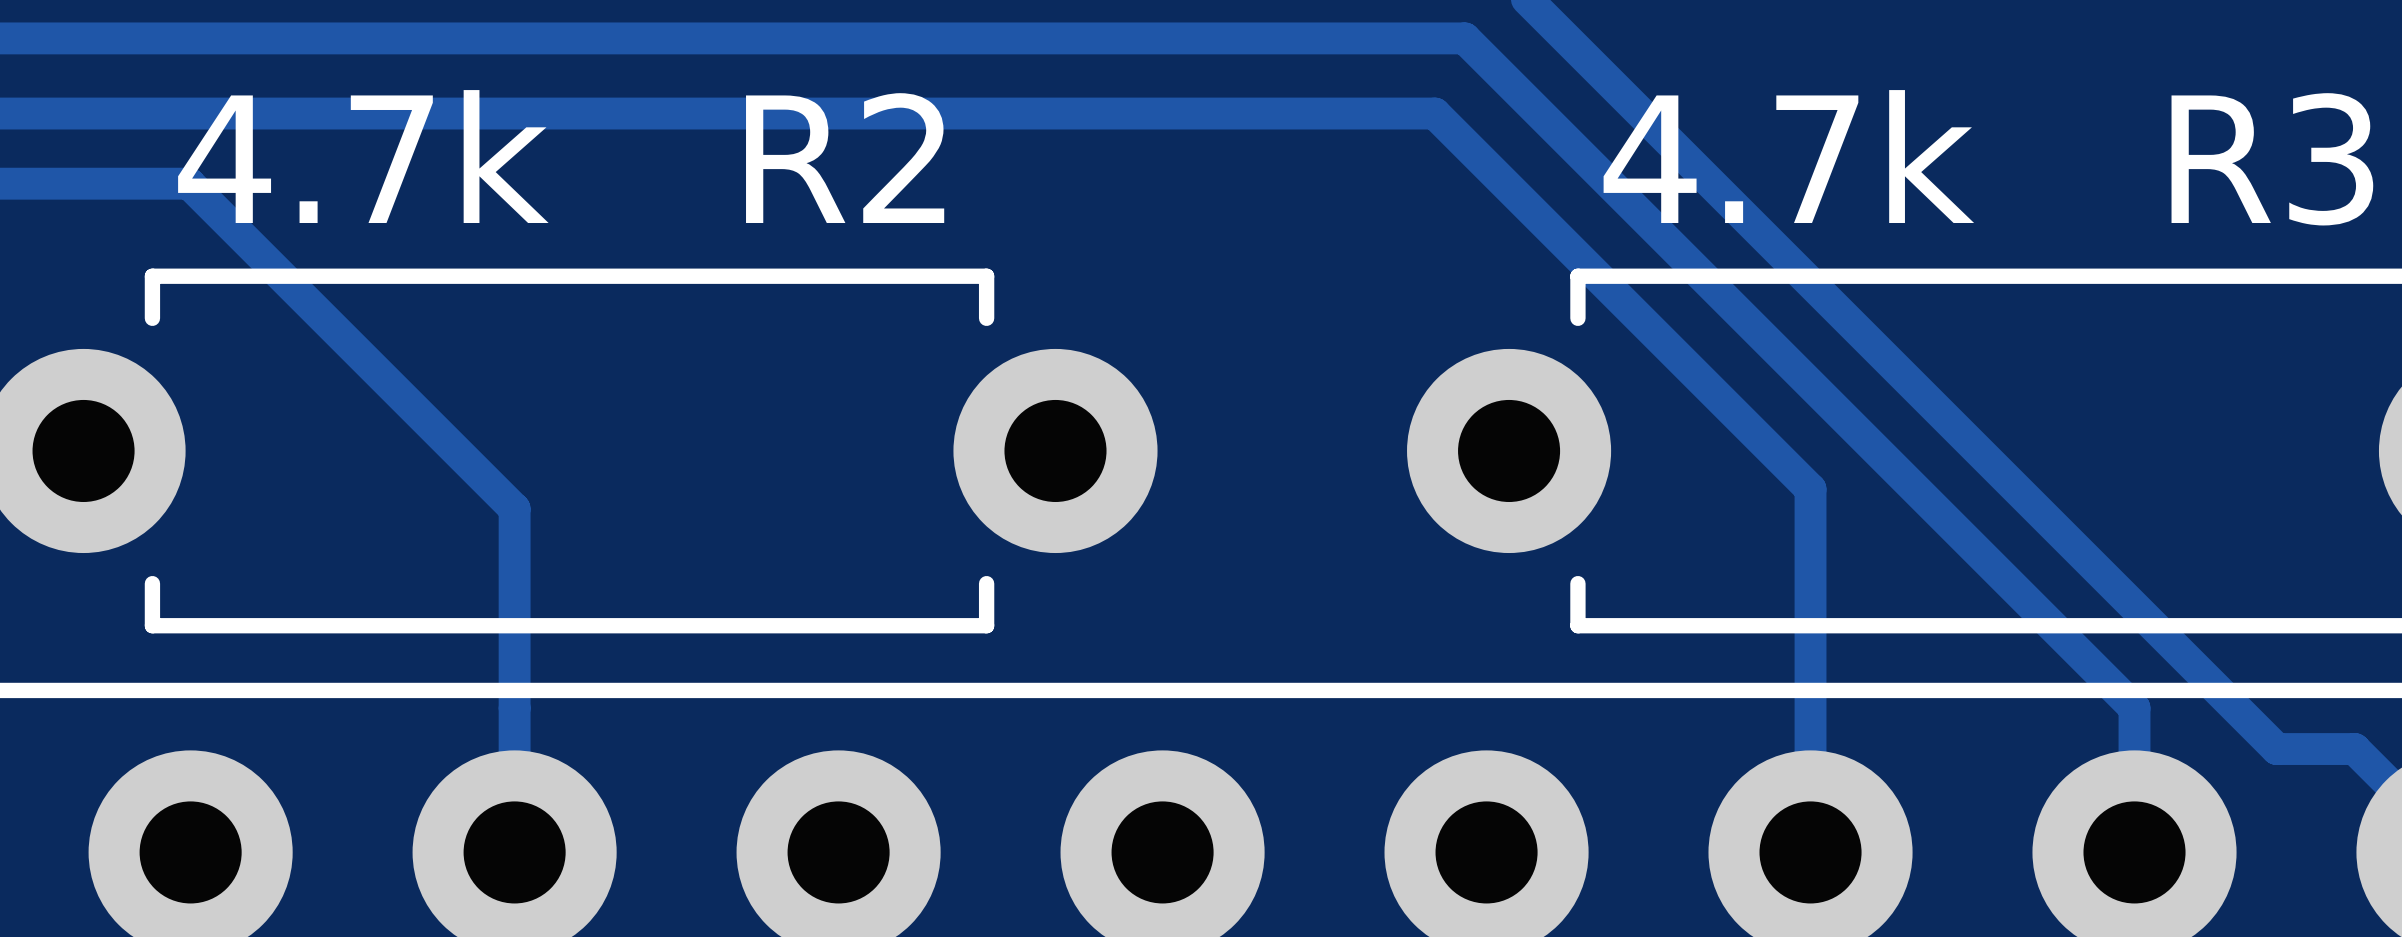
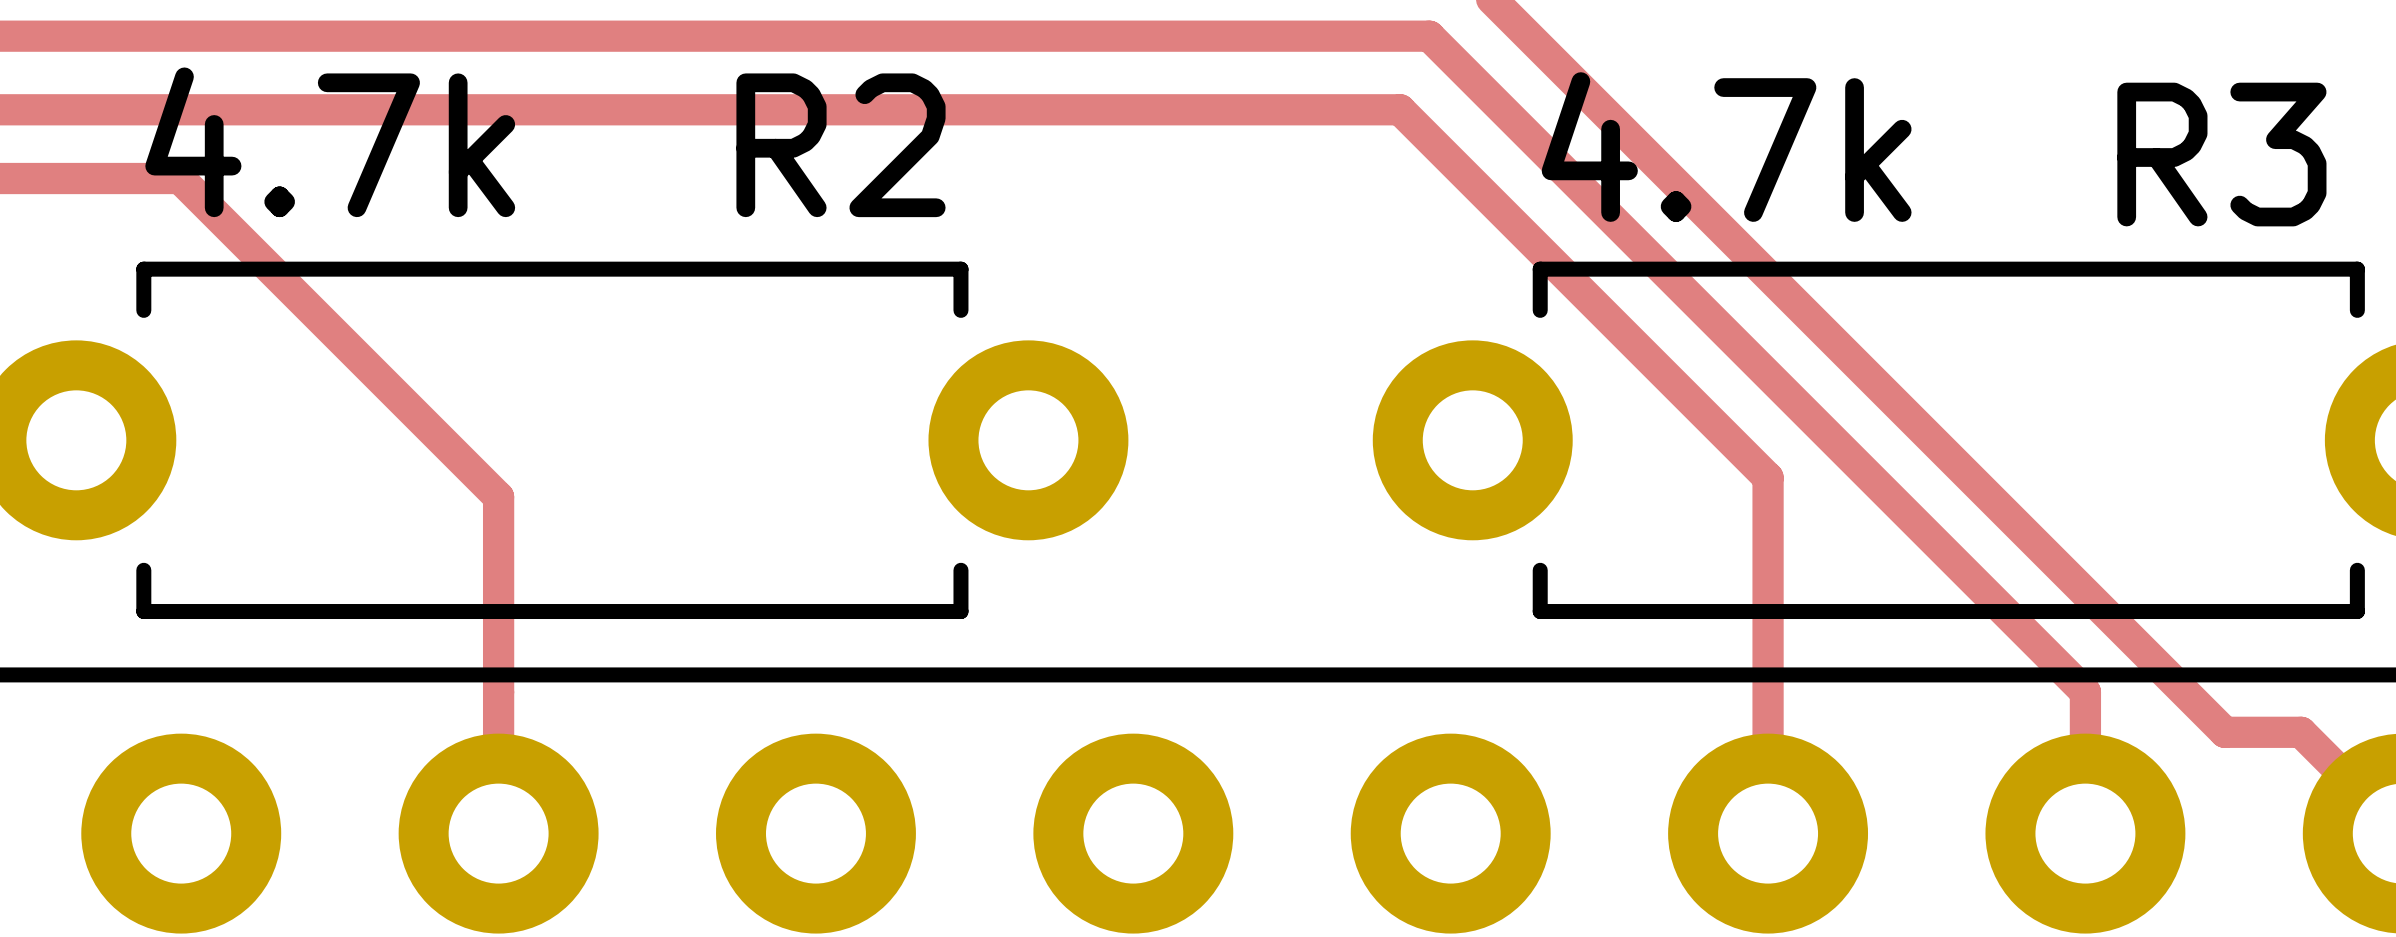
R2 value position: 4.7k (363, 156) -> 4.7k (330, 142)
R3 value position: 4.7k (1788, 156) -> 4.7k (1726, 147)
R2 name position: R2 (845, 158) -> R2 (840, 145)

